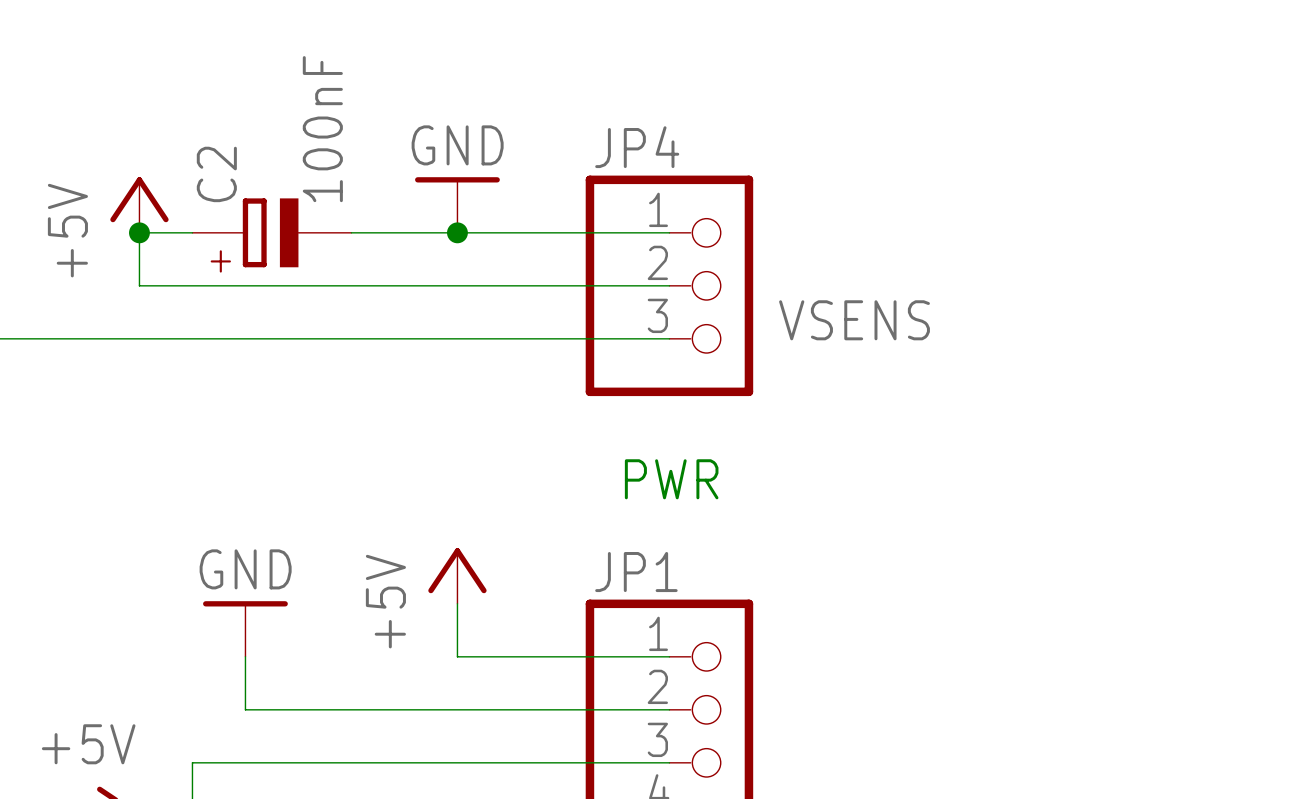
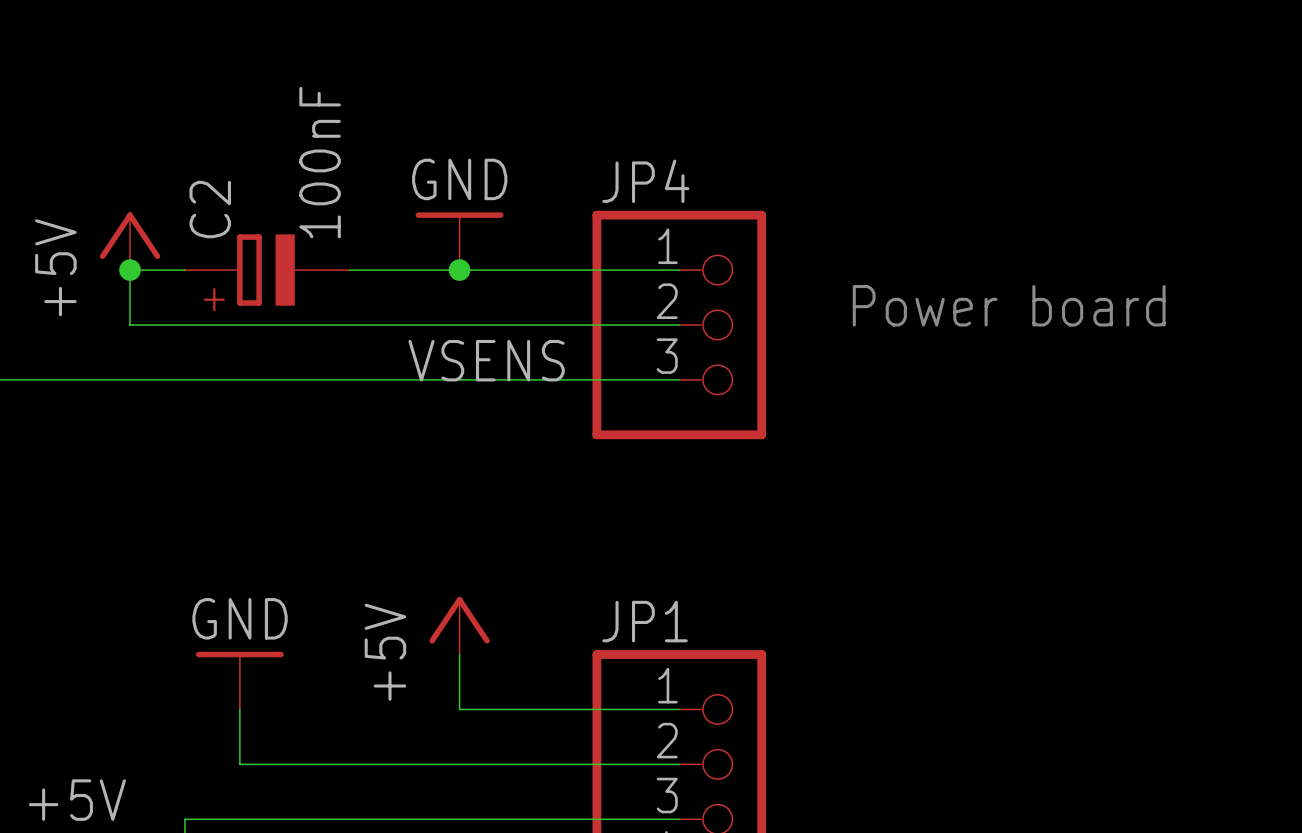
text: none -> Power board (1009, 305)
label position: VSENS (854, 320) -> VSENS (486, 360)
text: PWR (671, 479) -> none

